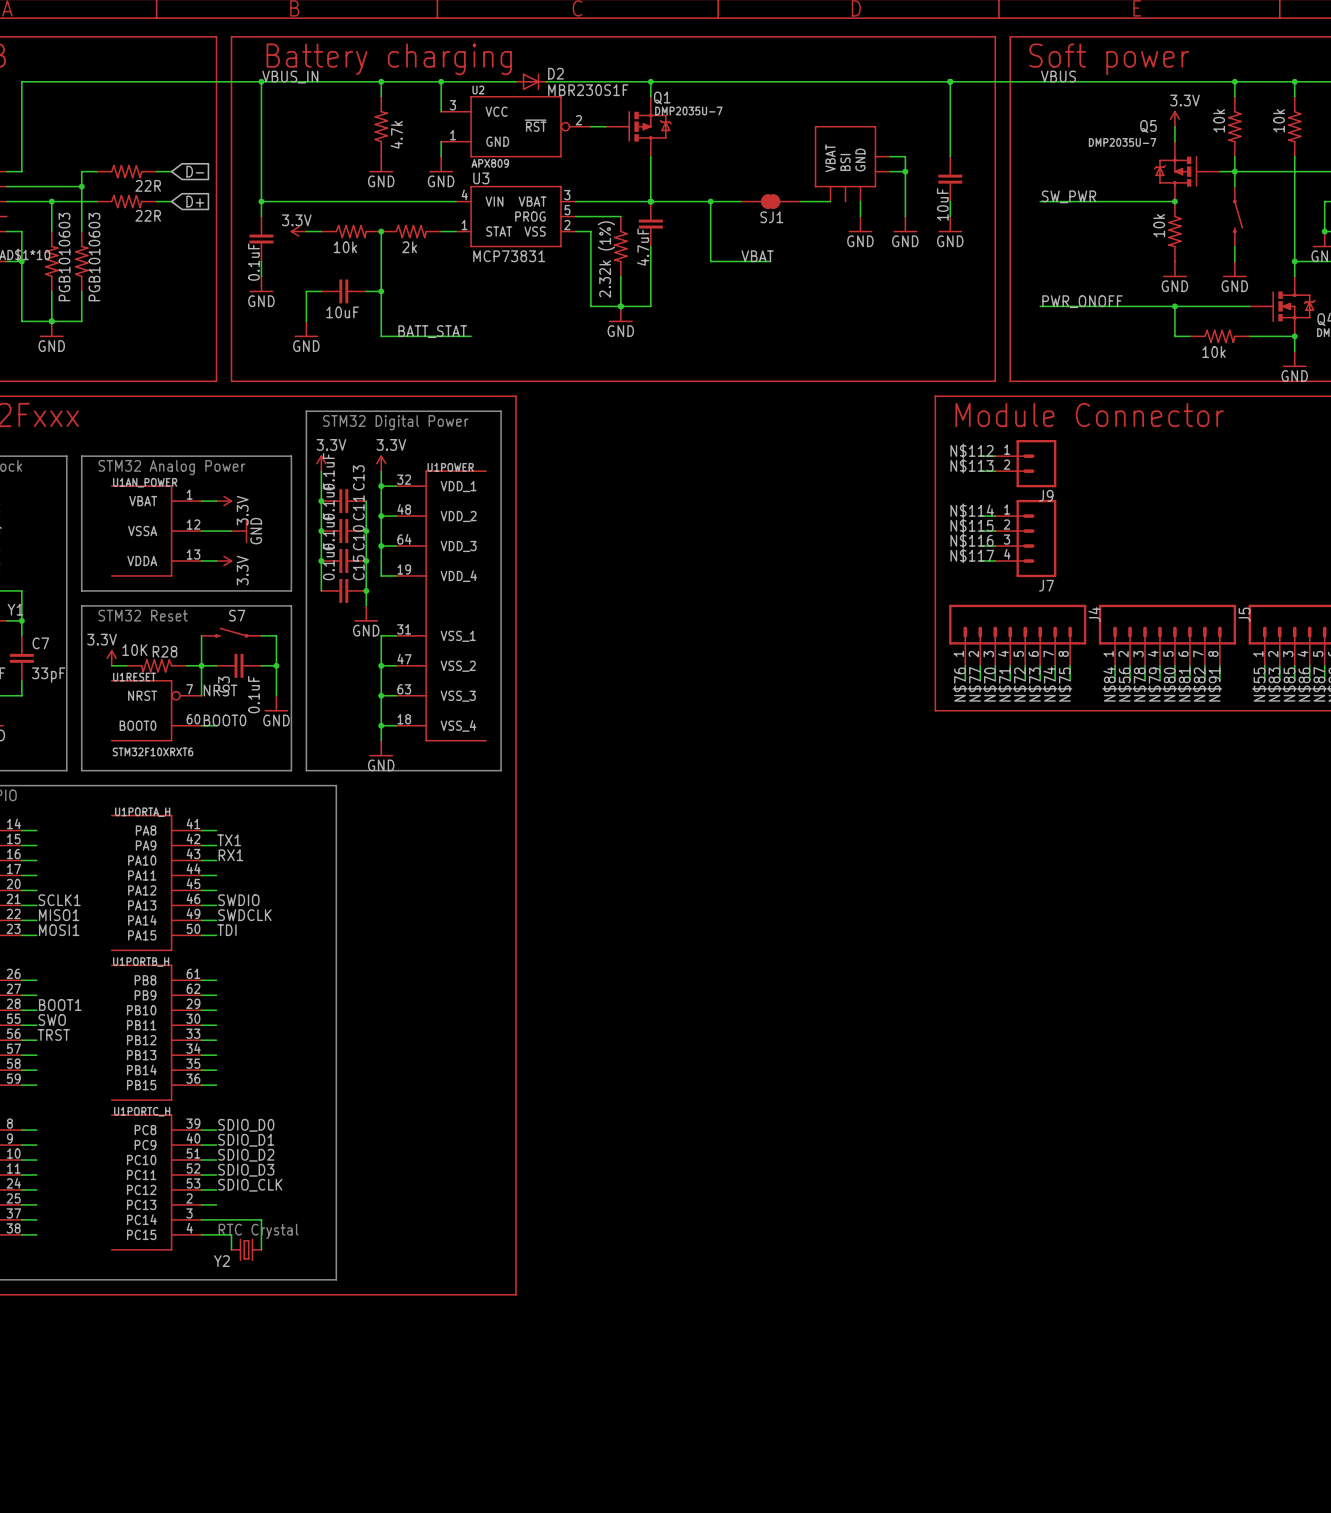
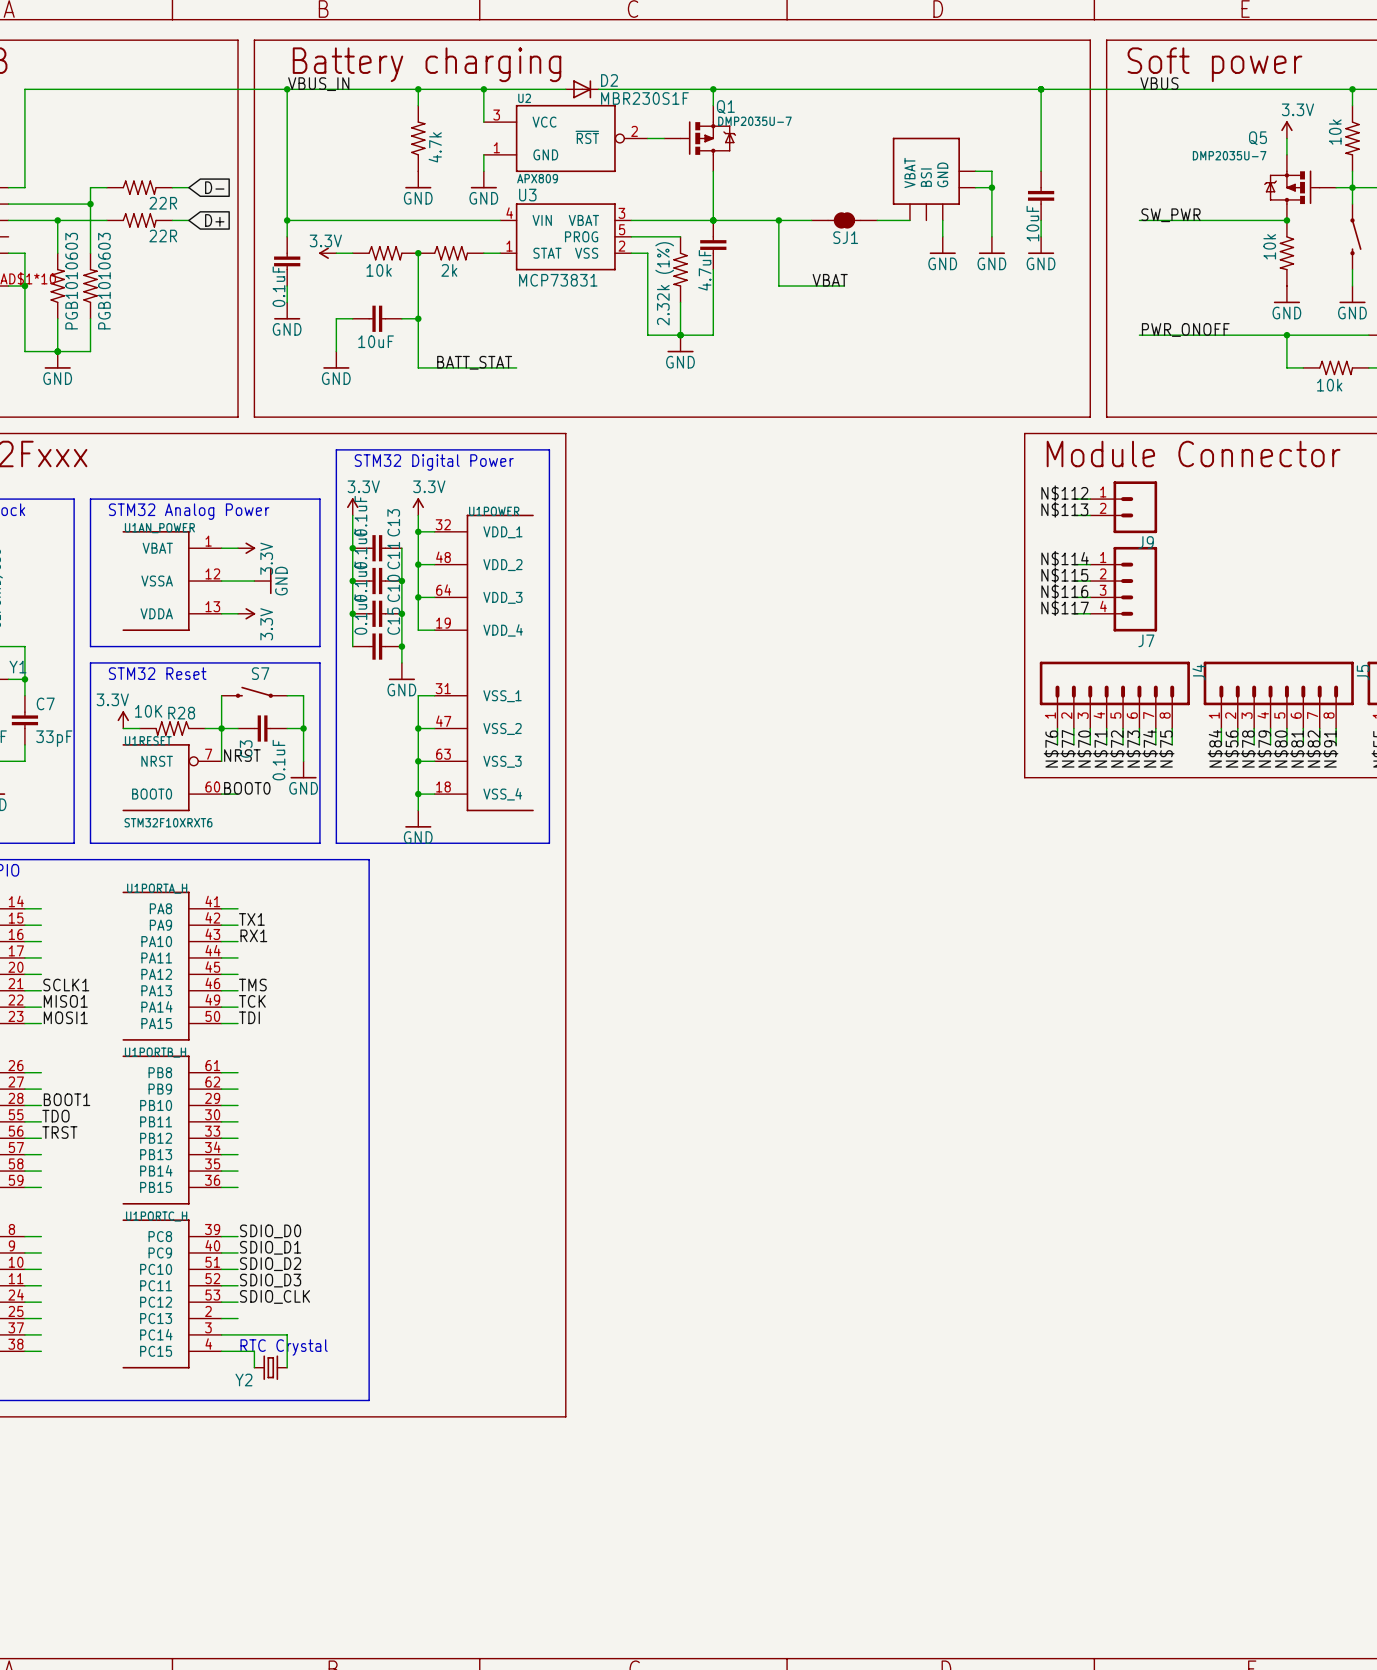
label: SWDIO (238, 900) -> TMS (252, 985)
label: SWDCLK (244, 915) -> TCK (252, 1001)
label: SWO (52, 1019) -> TDO (55, 1116)

